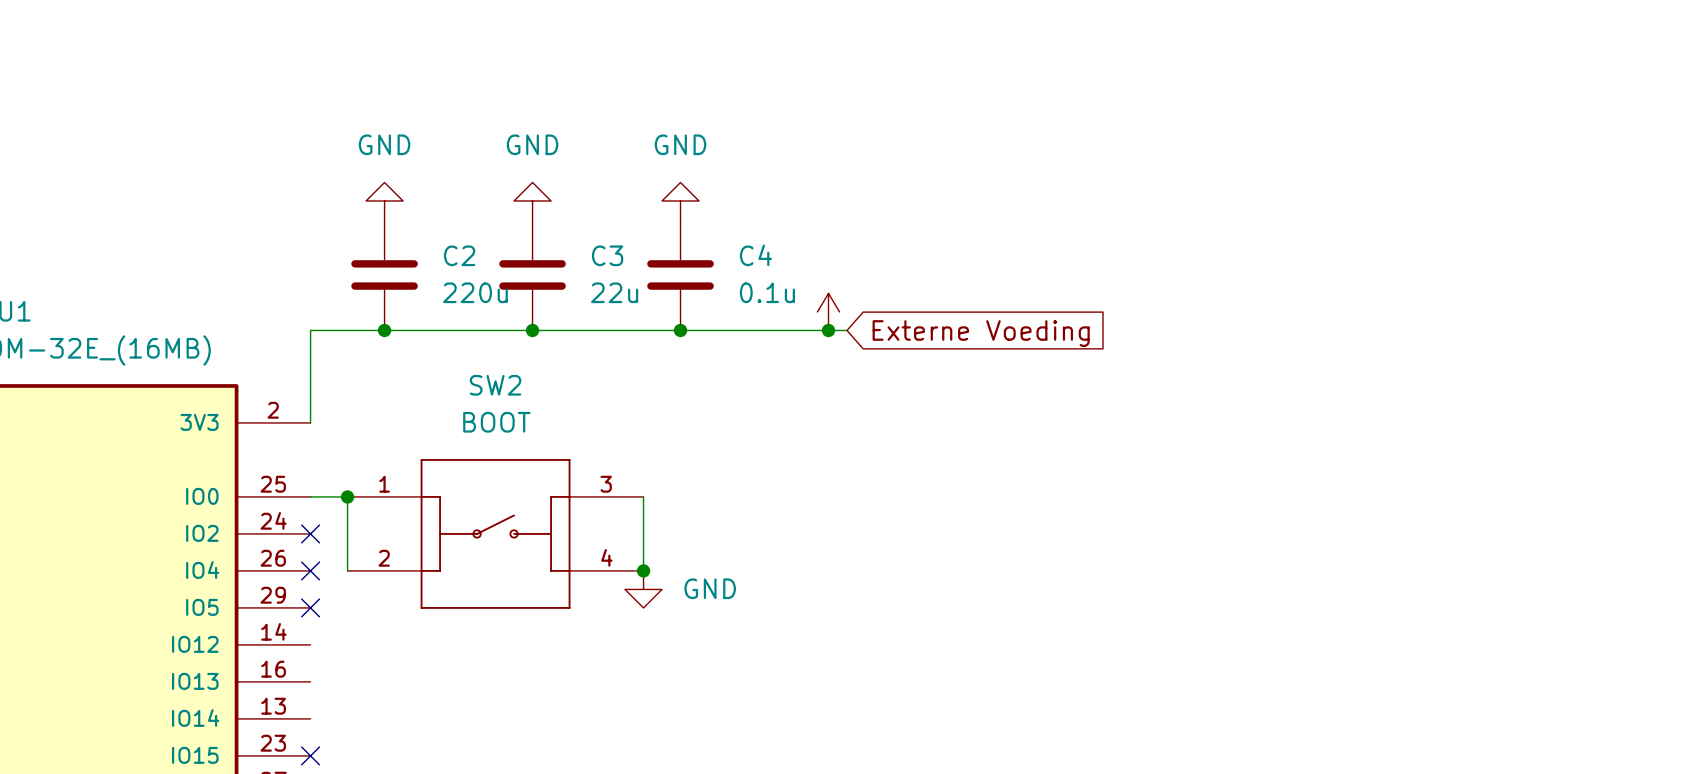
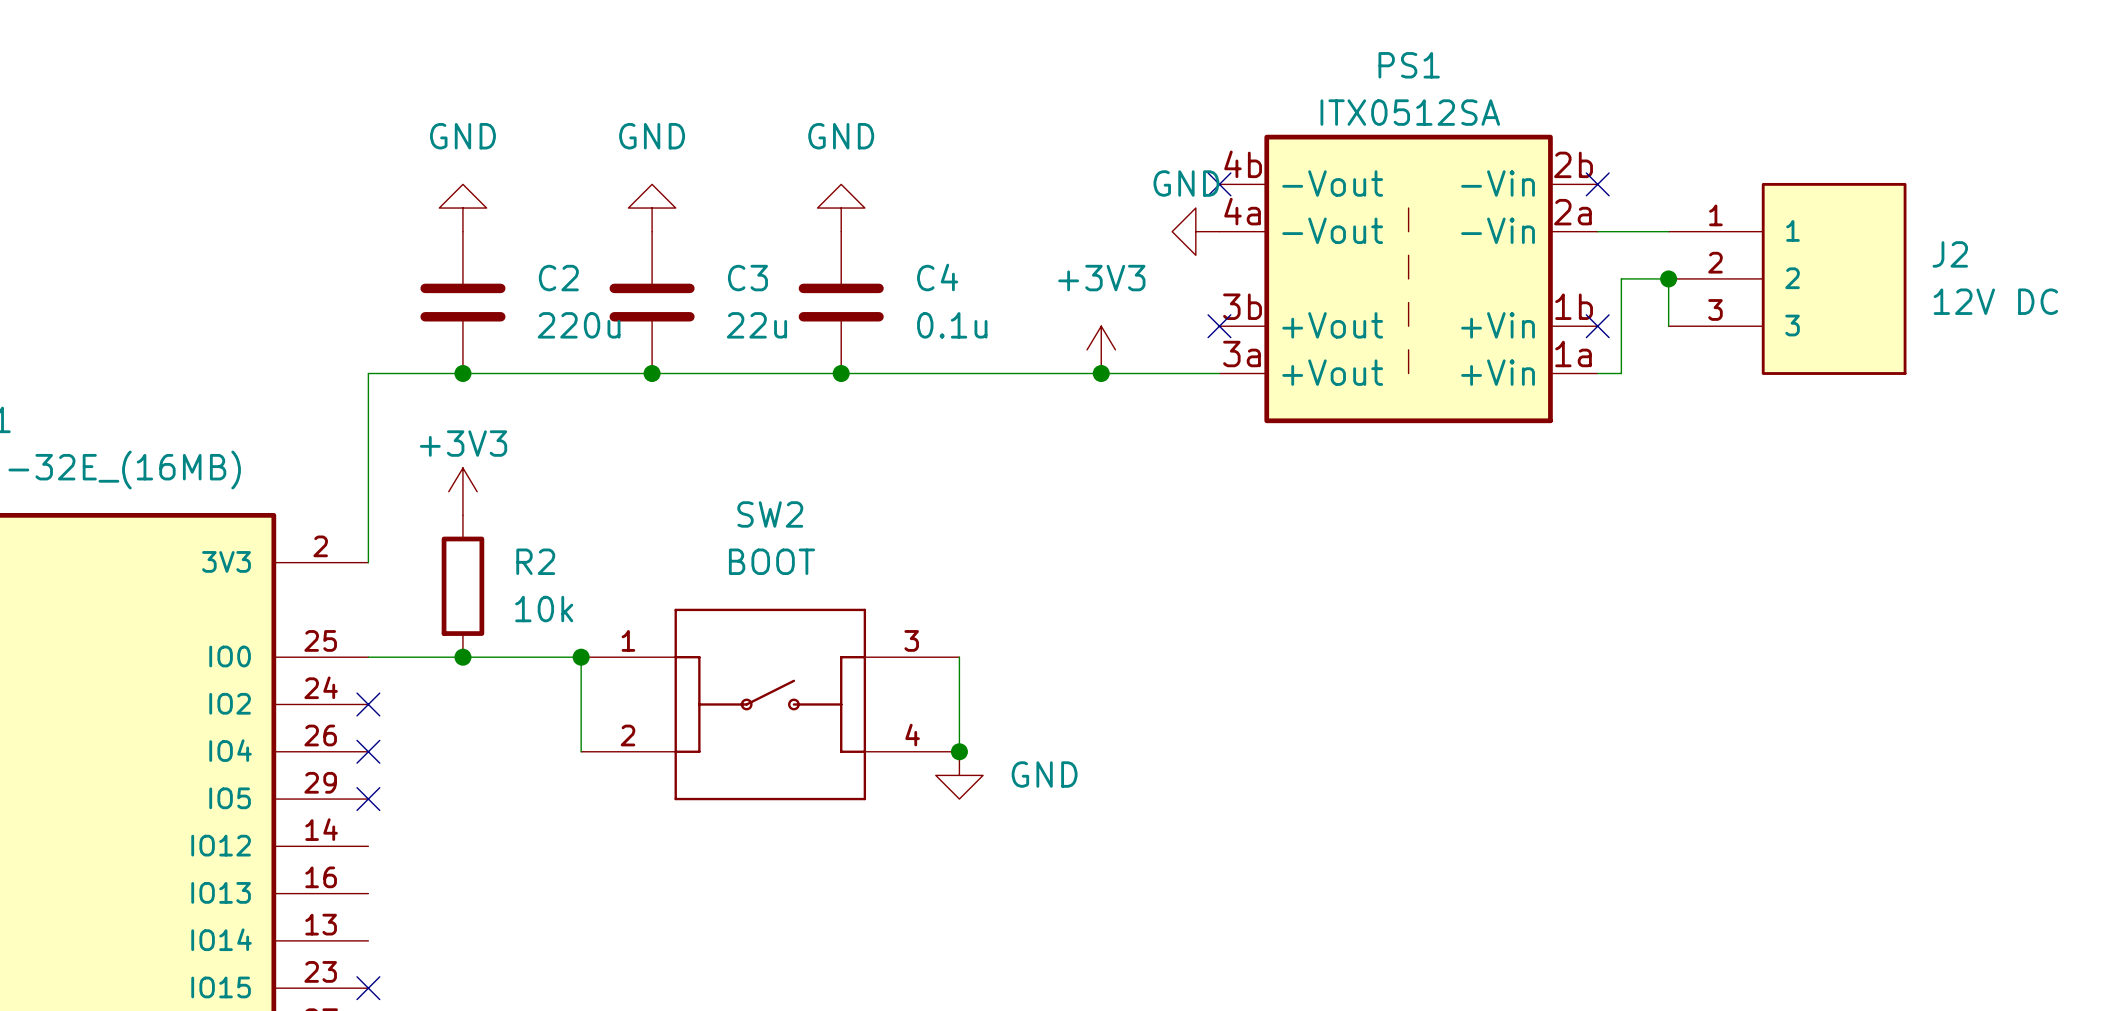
no-connect mark: none -> (1219, 184)
no-connect mark: none -> (1597, 184)
power symbol: none -> GND (1195, 231)
wire: none -> (1597, 231) (1668, 231)
power symbol position: GND (384, 200) -> GND (462, 208)
power symbol position: GND (532, 200) -> GND (652, 208)
power symbol position: GND (680, 200) -> GND (841, 208)
PS1: none -> ITX0512SA (1408, 278)
junction: none -> (1668, 278)
J2: none -> 12V DC (1787, 278)
no-connect mark: none -> (1219, 326)
no-connect mark: none -> (1597, 326)
wire: none -> (1668, 326) (1668, 278) (1621, 278) (1621, 373) (1597, 373)
power symbol: none -> +3V3 (1101, 349)
C2 position: (384, 274) -> (462, 302)
C3 position: (532, 274) -> (652, 302)
C4 position: (680, 274) -> (841, 302)
power symbol: (828, 311) -> none
wire: (310, 330) (847, 330) -> (368, 444) (368, 373) (1219, 373)
junction position: (384, 330) -> (462, 373)
junction position: (532, 330) -> (652, 373)
junction position: (680, 330) -> (841, 373)
junction position: (828, 330) -> (1101, 373)
global label: Externe Voeding (981, 333) -> none
power symbol: none -> +3V3 (462, 491)
R2: none -> 10k (462, 586)
wire: (347, 496) (347, 570) -> (415, 657) (581, 657) (581, 751)
junction position: (347, 496) -> (462, 657)
junction: none -> (581, 657)
wire: (643, 496) (643, 570) -> (959, 657) (959, 751)
SW2 position: (495, 533) -> (770, 704)
junction: (643, 570) -> none
junction: none -> (959, 751)
power symbol position: GND (643, 589) -> GND (959, 775)

